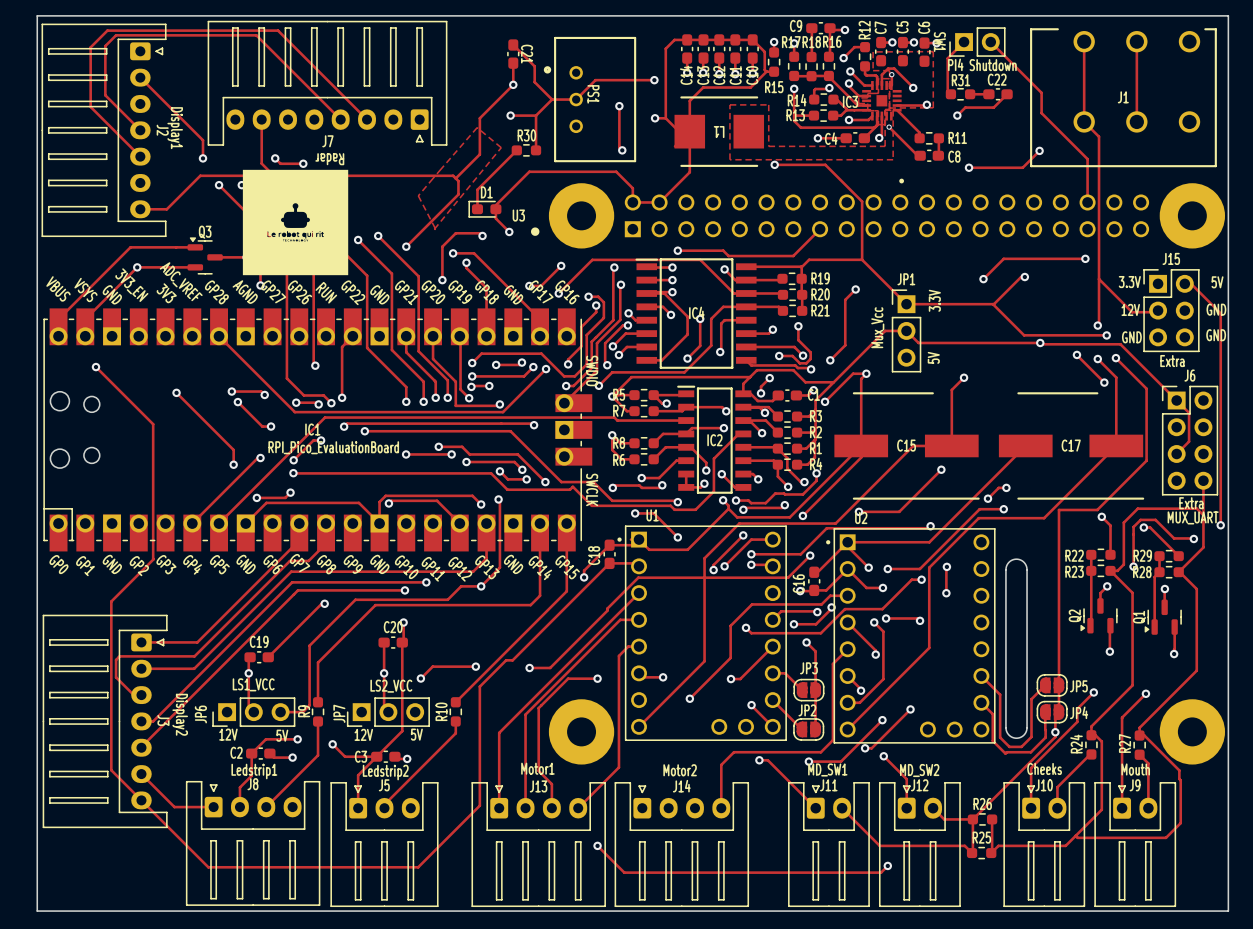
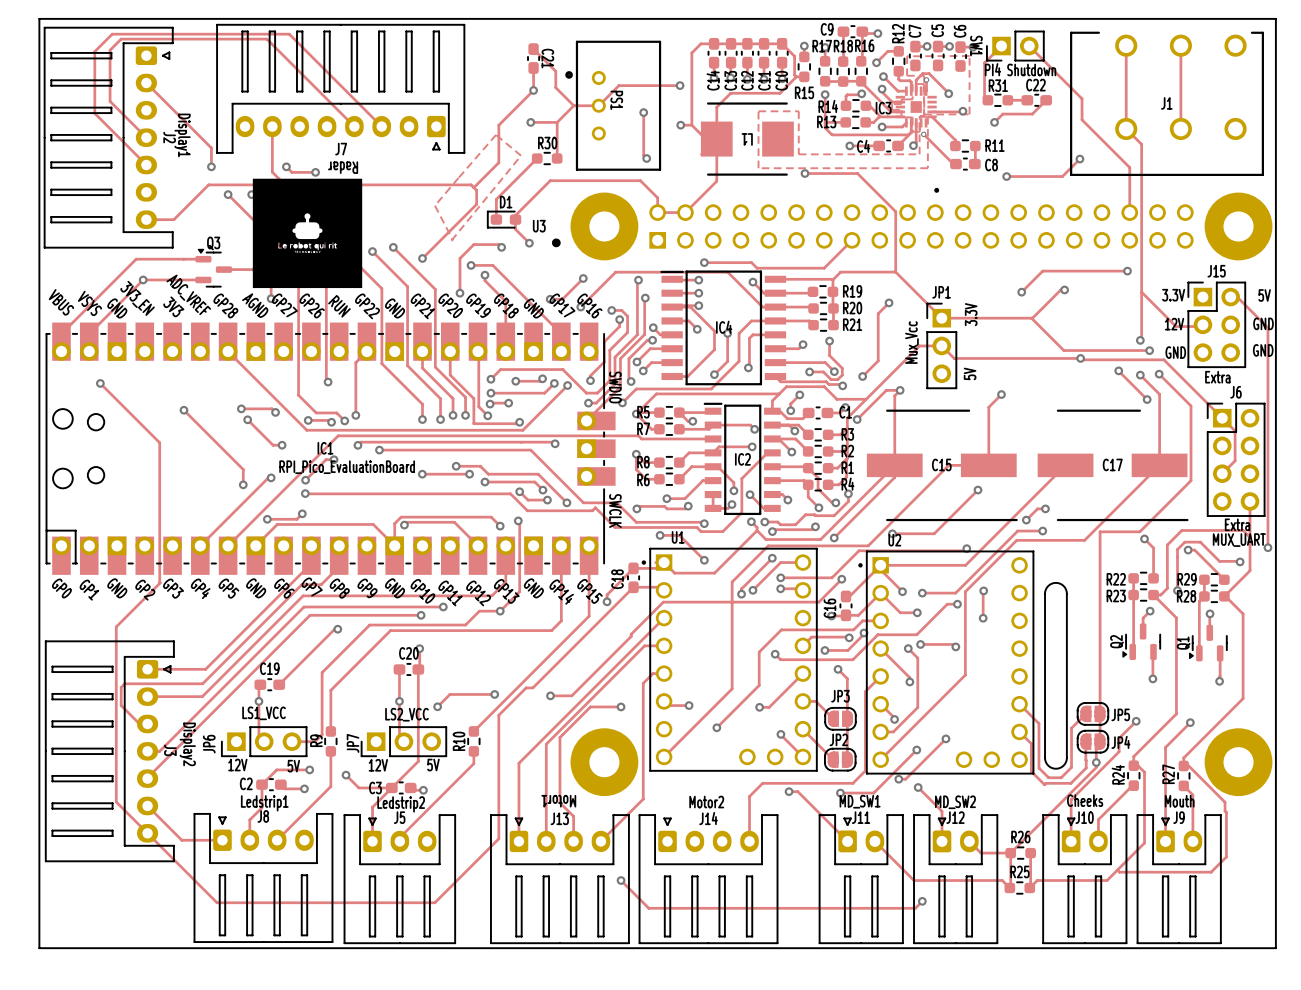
J13 value rotation: 0° (537, 768) -> 180° (558, 801)

